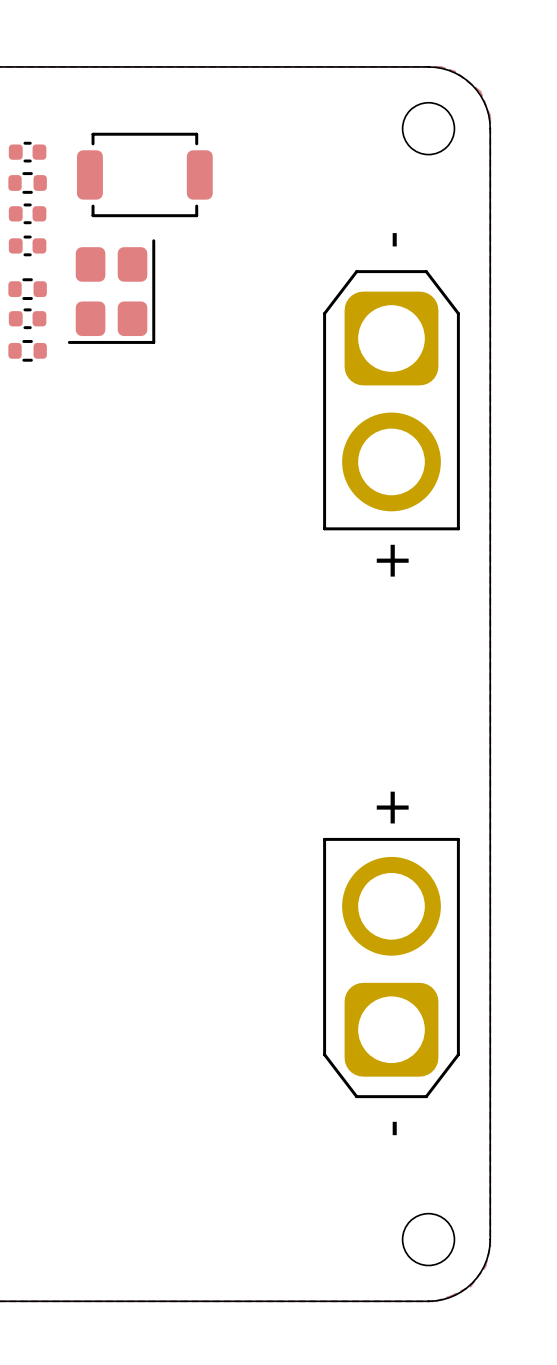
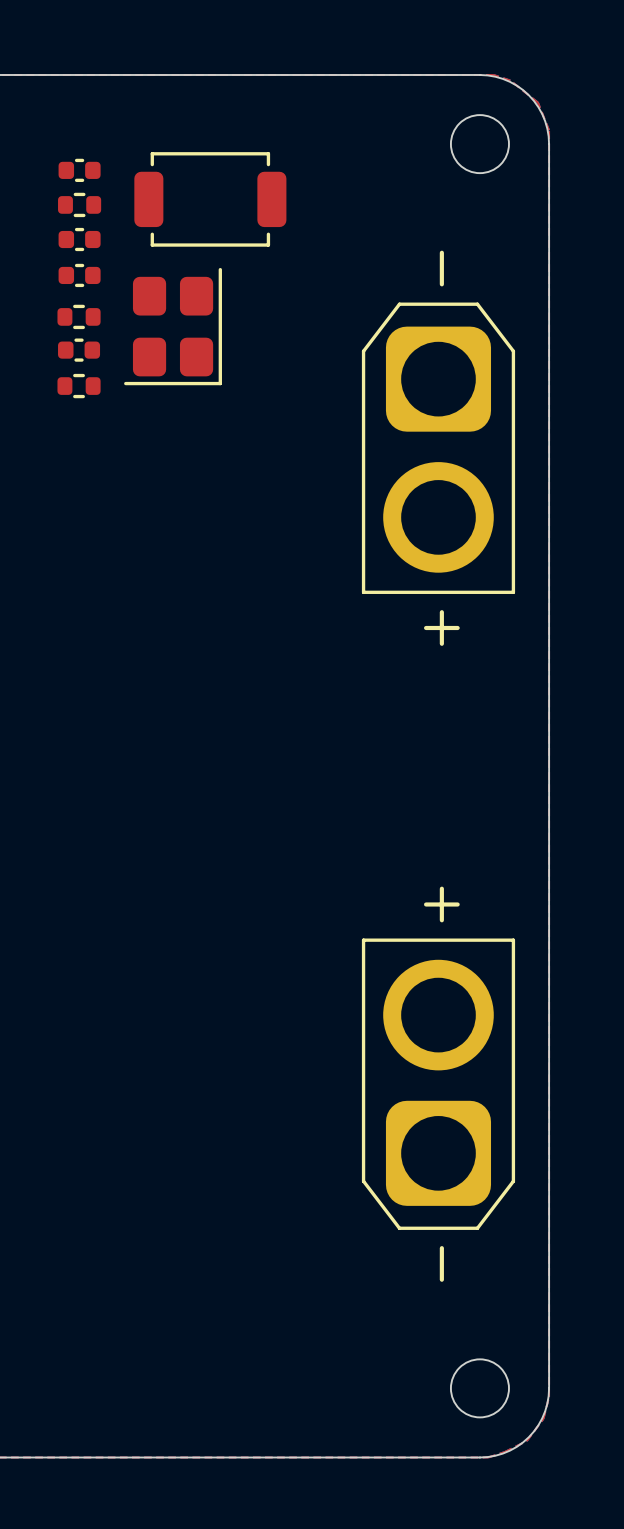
part: (27, 152) -> none
part: none -> (79, 170)
part position: (144, 174) -> (210, 199)
part position: (27, 182) -> (79, 204)
part: (27, 213) -> none
part: none -> (79, 239)
part: (27, 245) -> none
part: none -> (79, 275)
part: none -> (79, 316)
part: (27, 289) -> none
part position: (111, 291) -> (173, 326)
part: none -> (79, 350)
part: (27, 318) -> none
part: none -> (79, 386)
part: (27, 350) -> none

